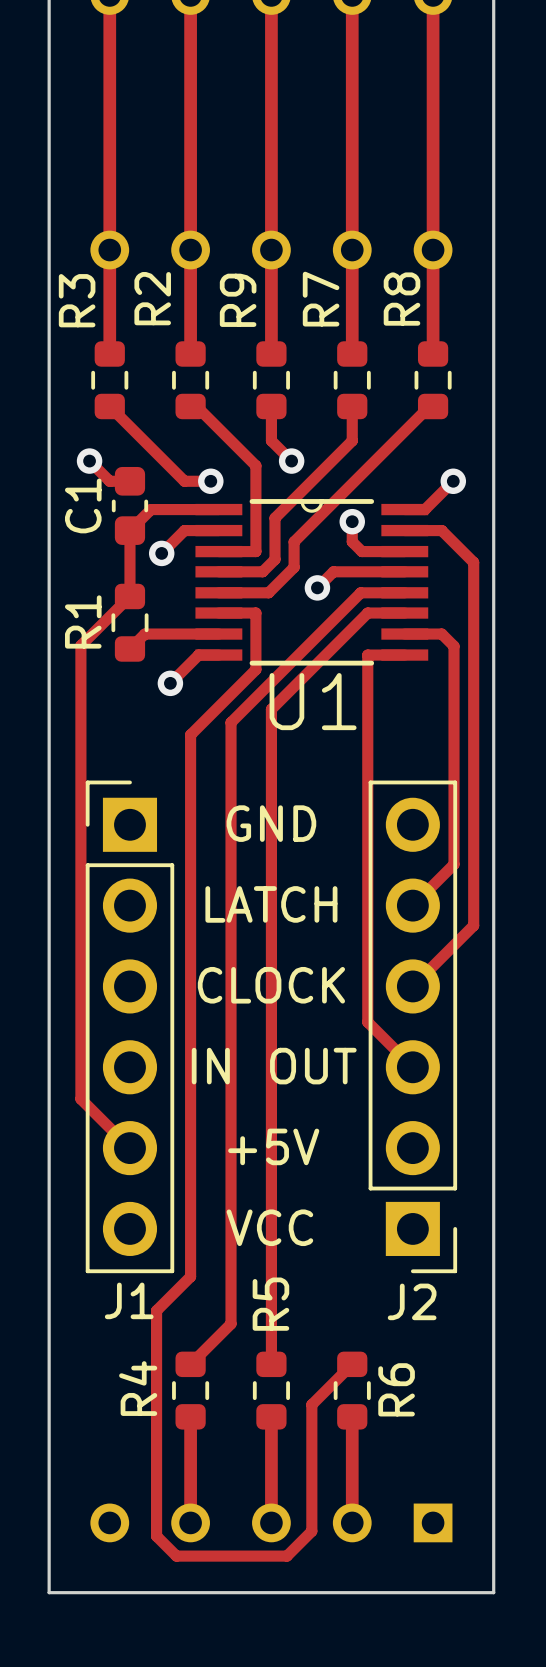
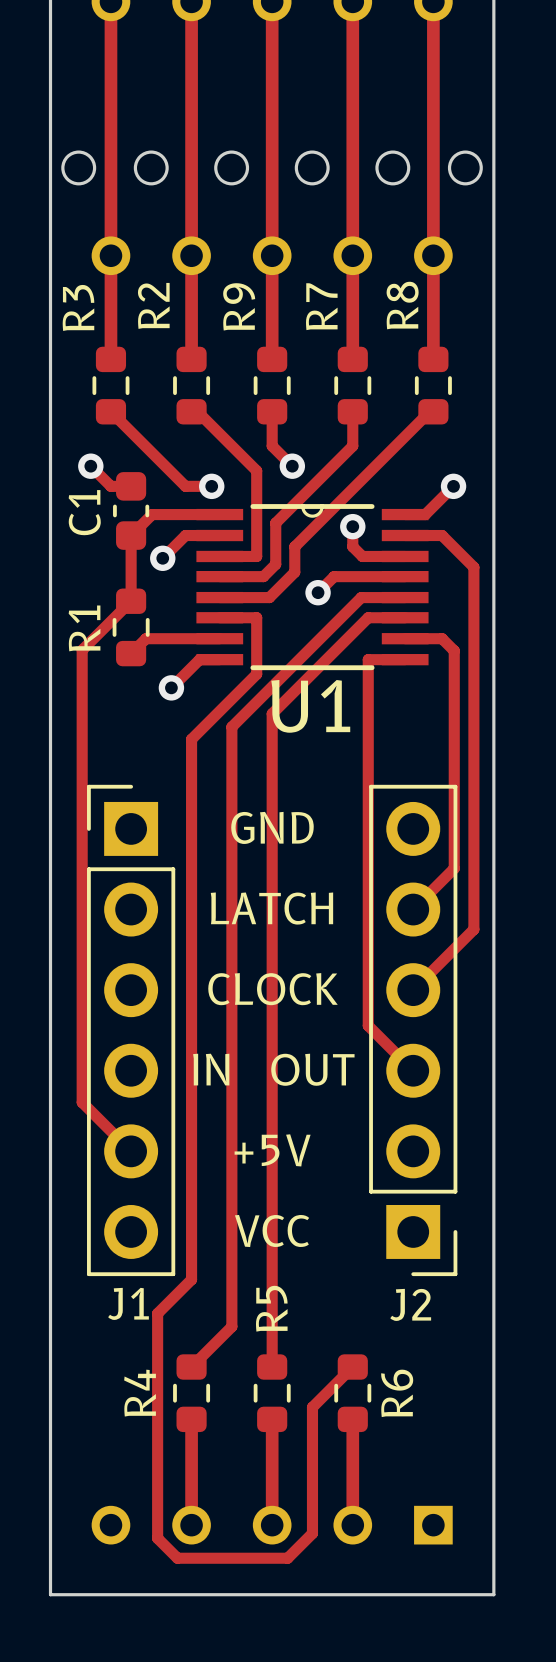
round board edge: none -> [61, 150, 97, 186]
round board edge: none -> [133, 150, 169, 186]
round board edge: none -> [214, 150, 250, 186]
round board edge: none -> [294, 150, 330, 186]
round board edge: none -> [375, 150, 411, 186]
round board edge: none -> [447, 150, 483, 186]

